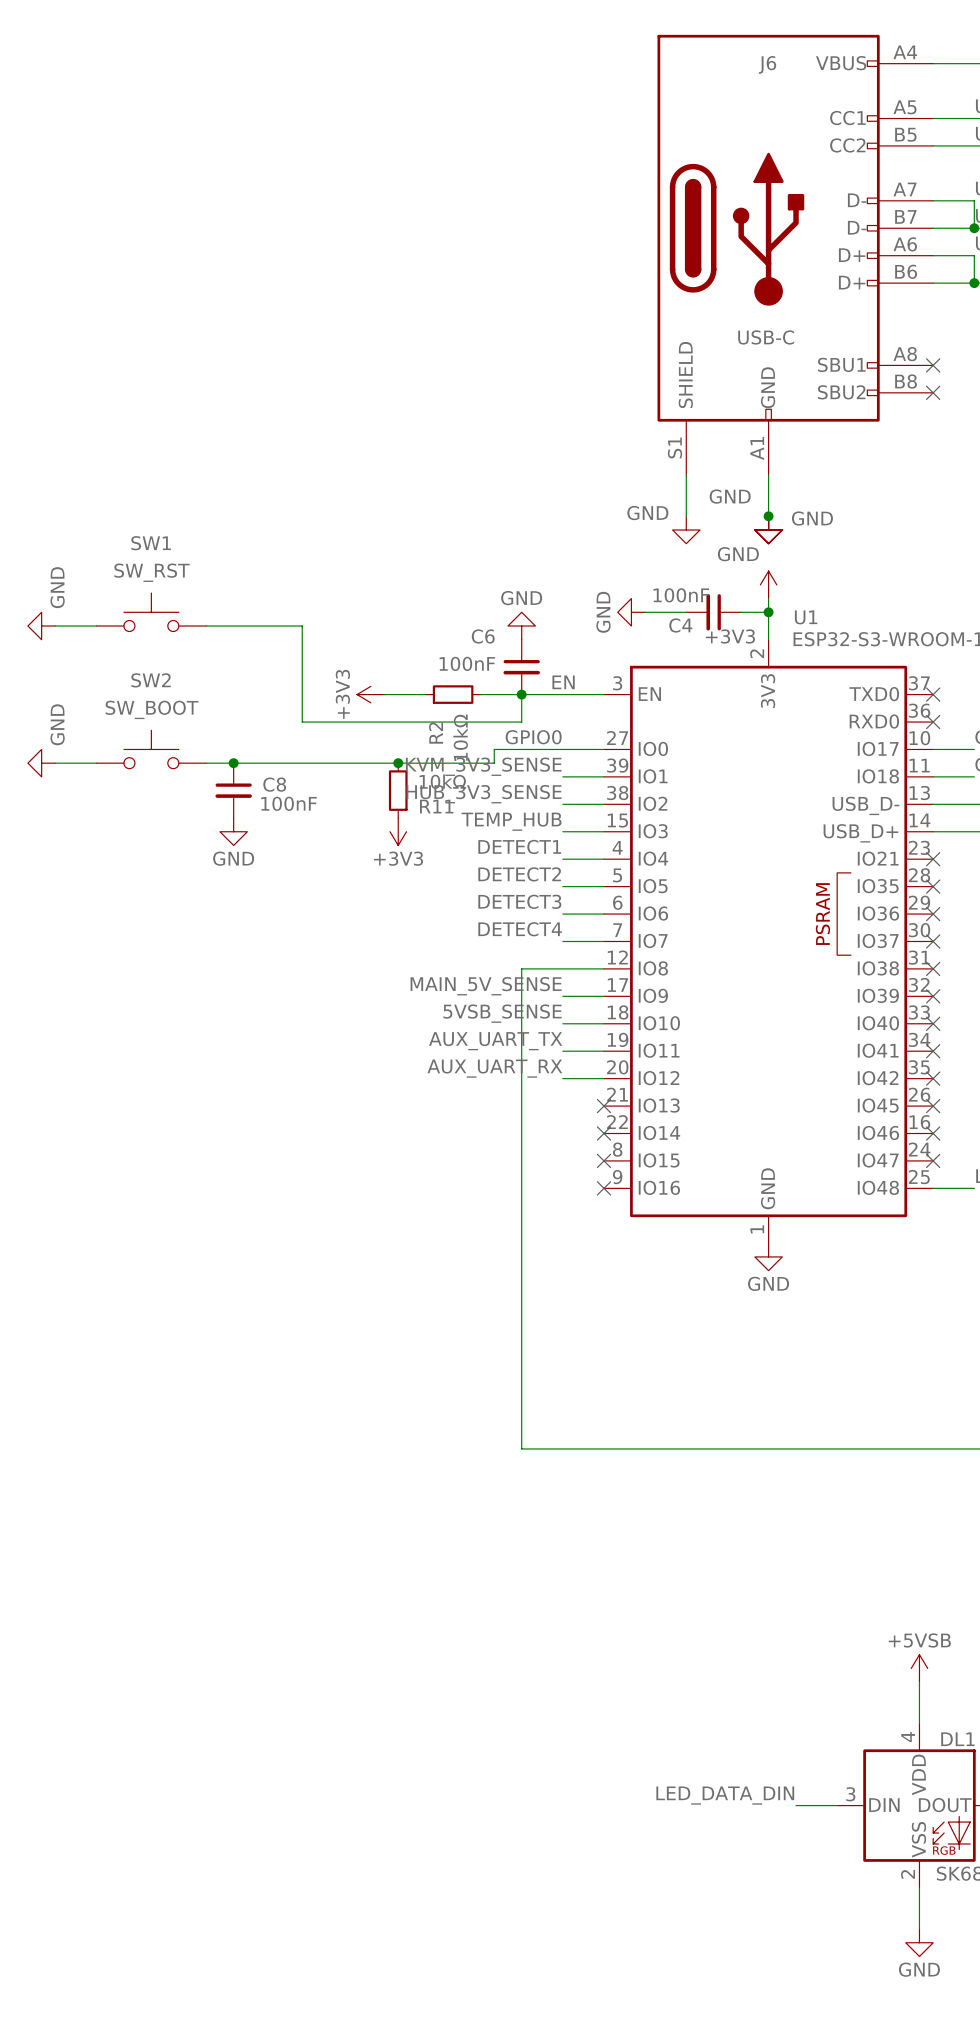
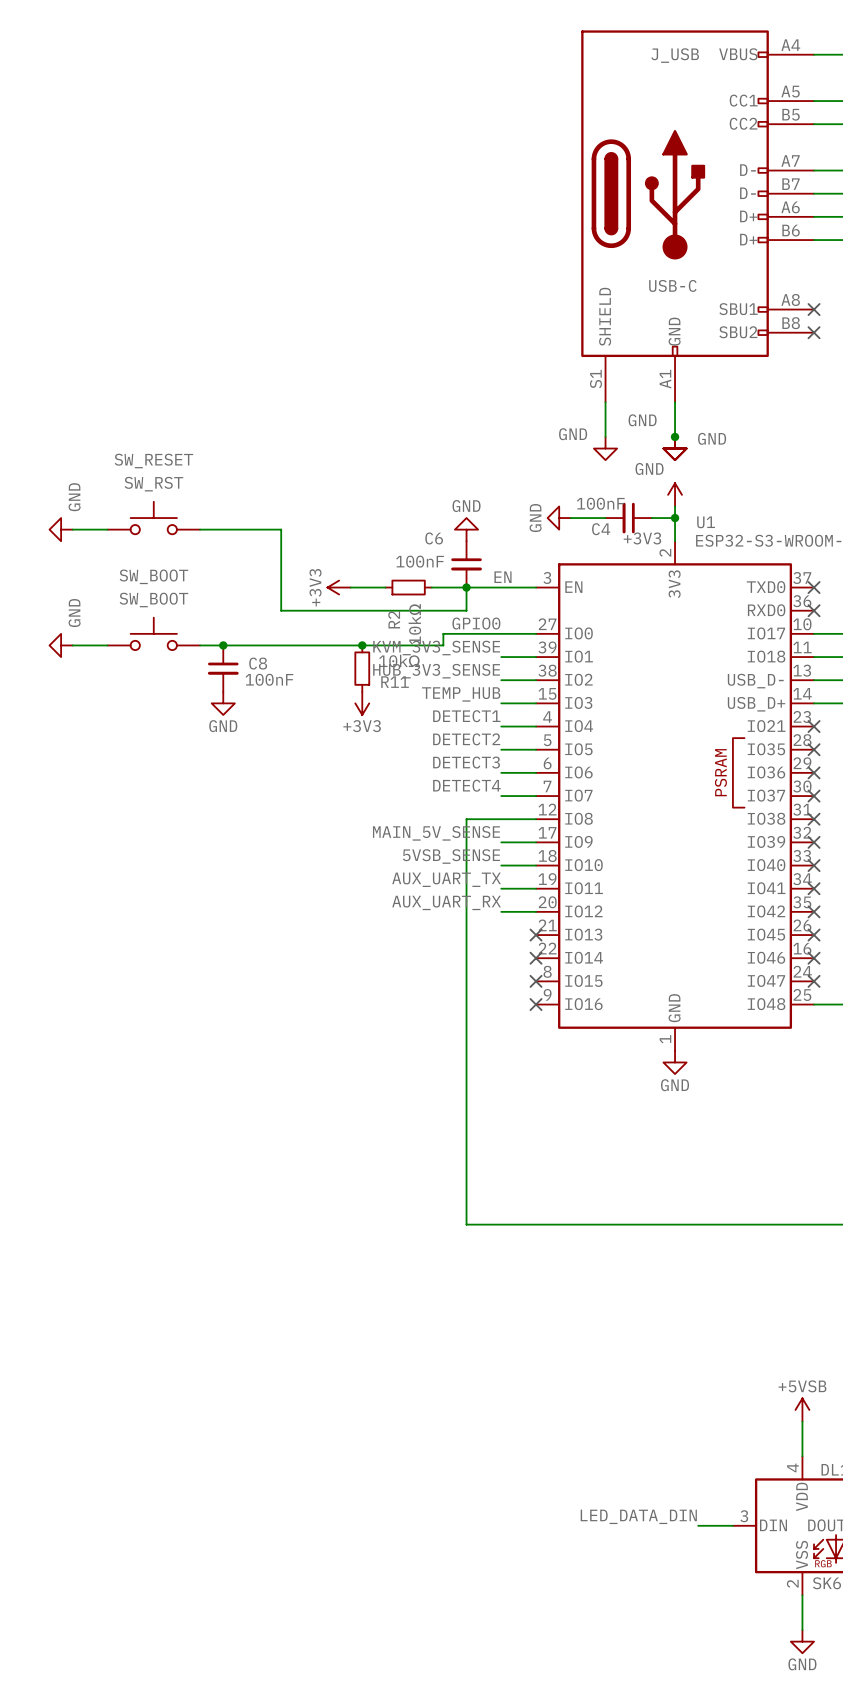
J6 name: J6 (767, 64) -> J_USB (675, 55)
SW1 name: SW1 (151, 543) -> SW_RESET (153, 460)
SW2 name: SW2 (151, 680) -> SW_BOOT (153, 576)

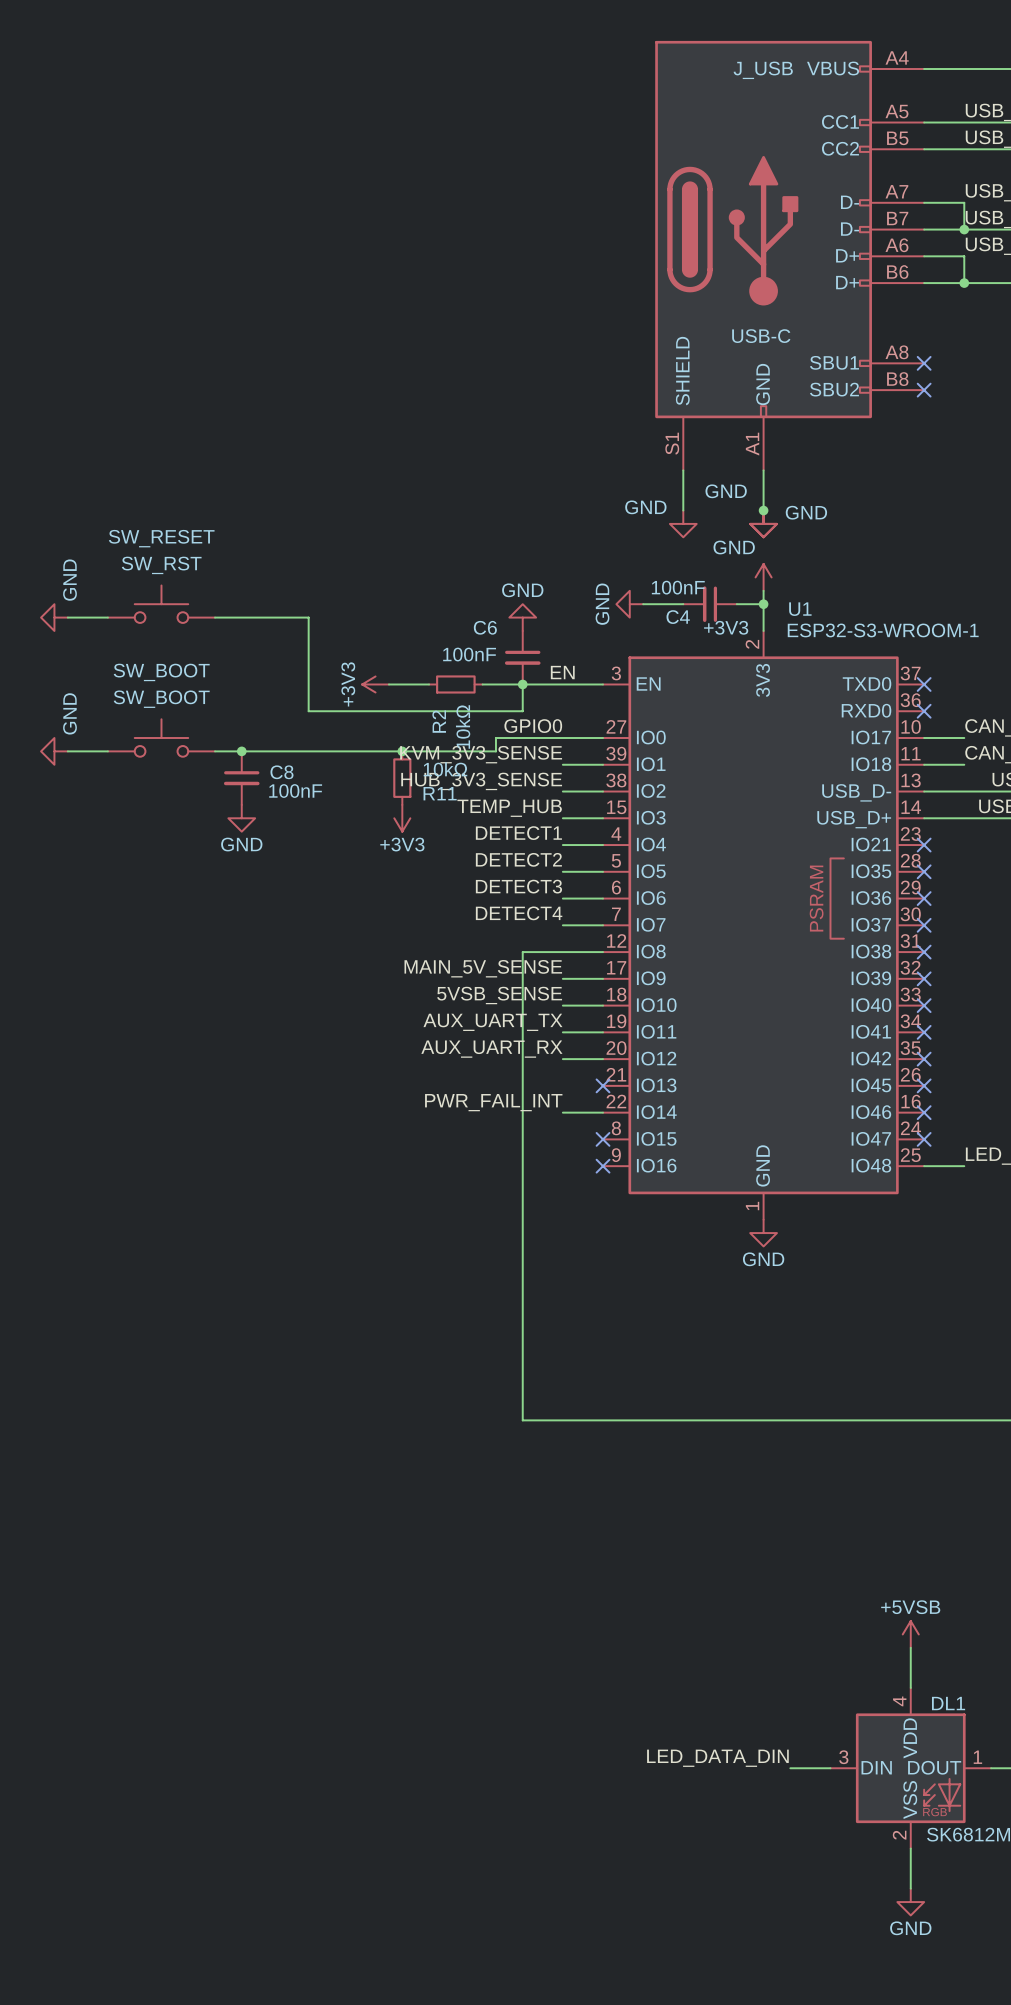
label: none -> PWR_FAIL_INT (493, 1102)
wire: none -> (562, 1112) (603, 1112)
no-connect mark: (536, 958) -> none

